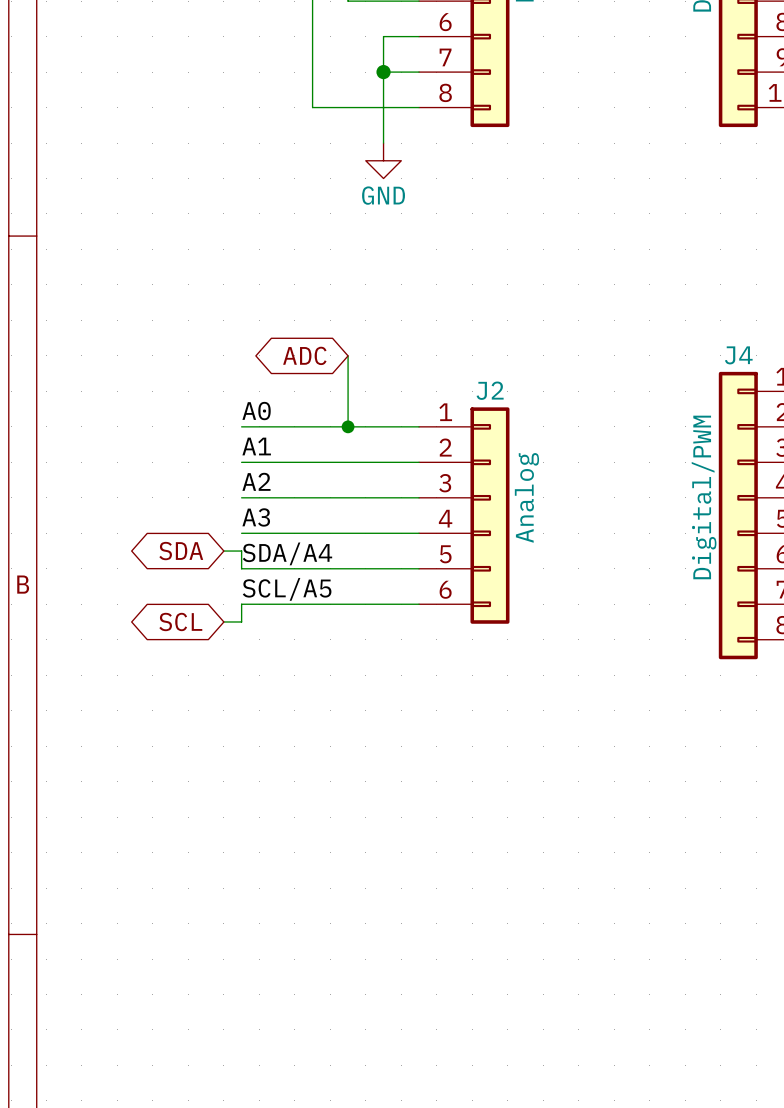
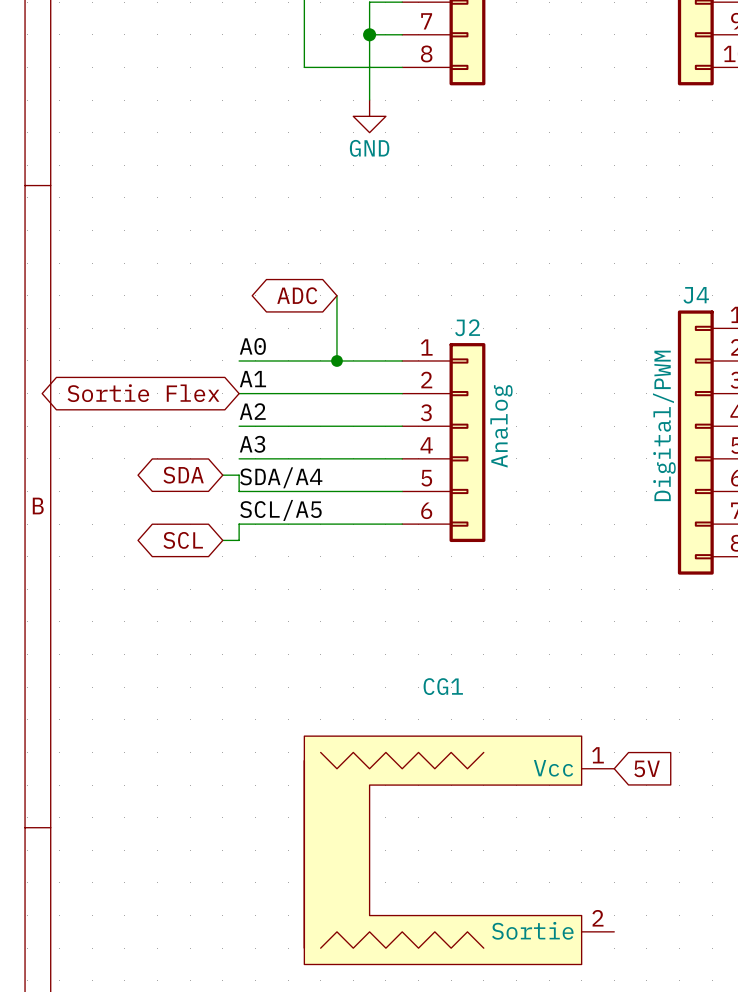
global label: none -> Sortie Flex (143, 393)
global label: none -> 5V (647, 768)
CG1: none -> (459, 850)

